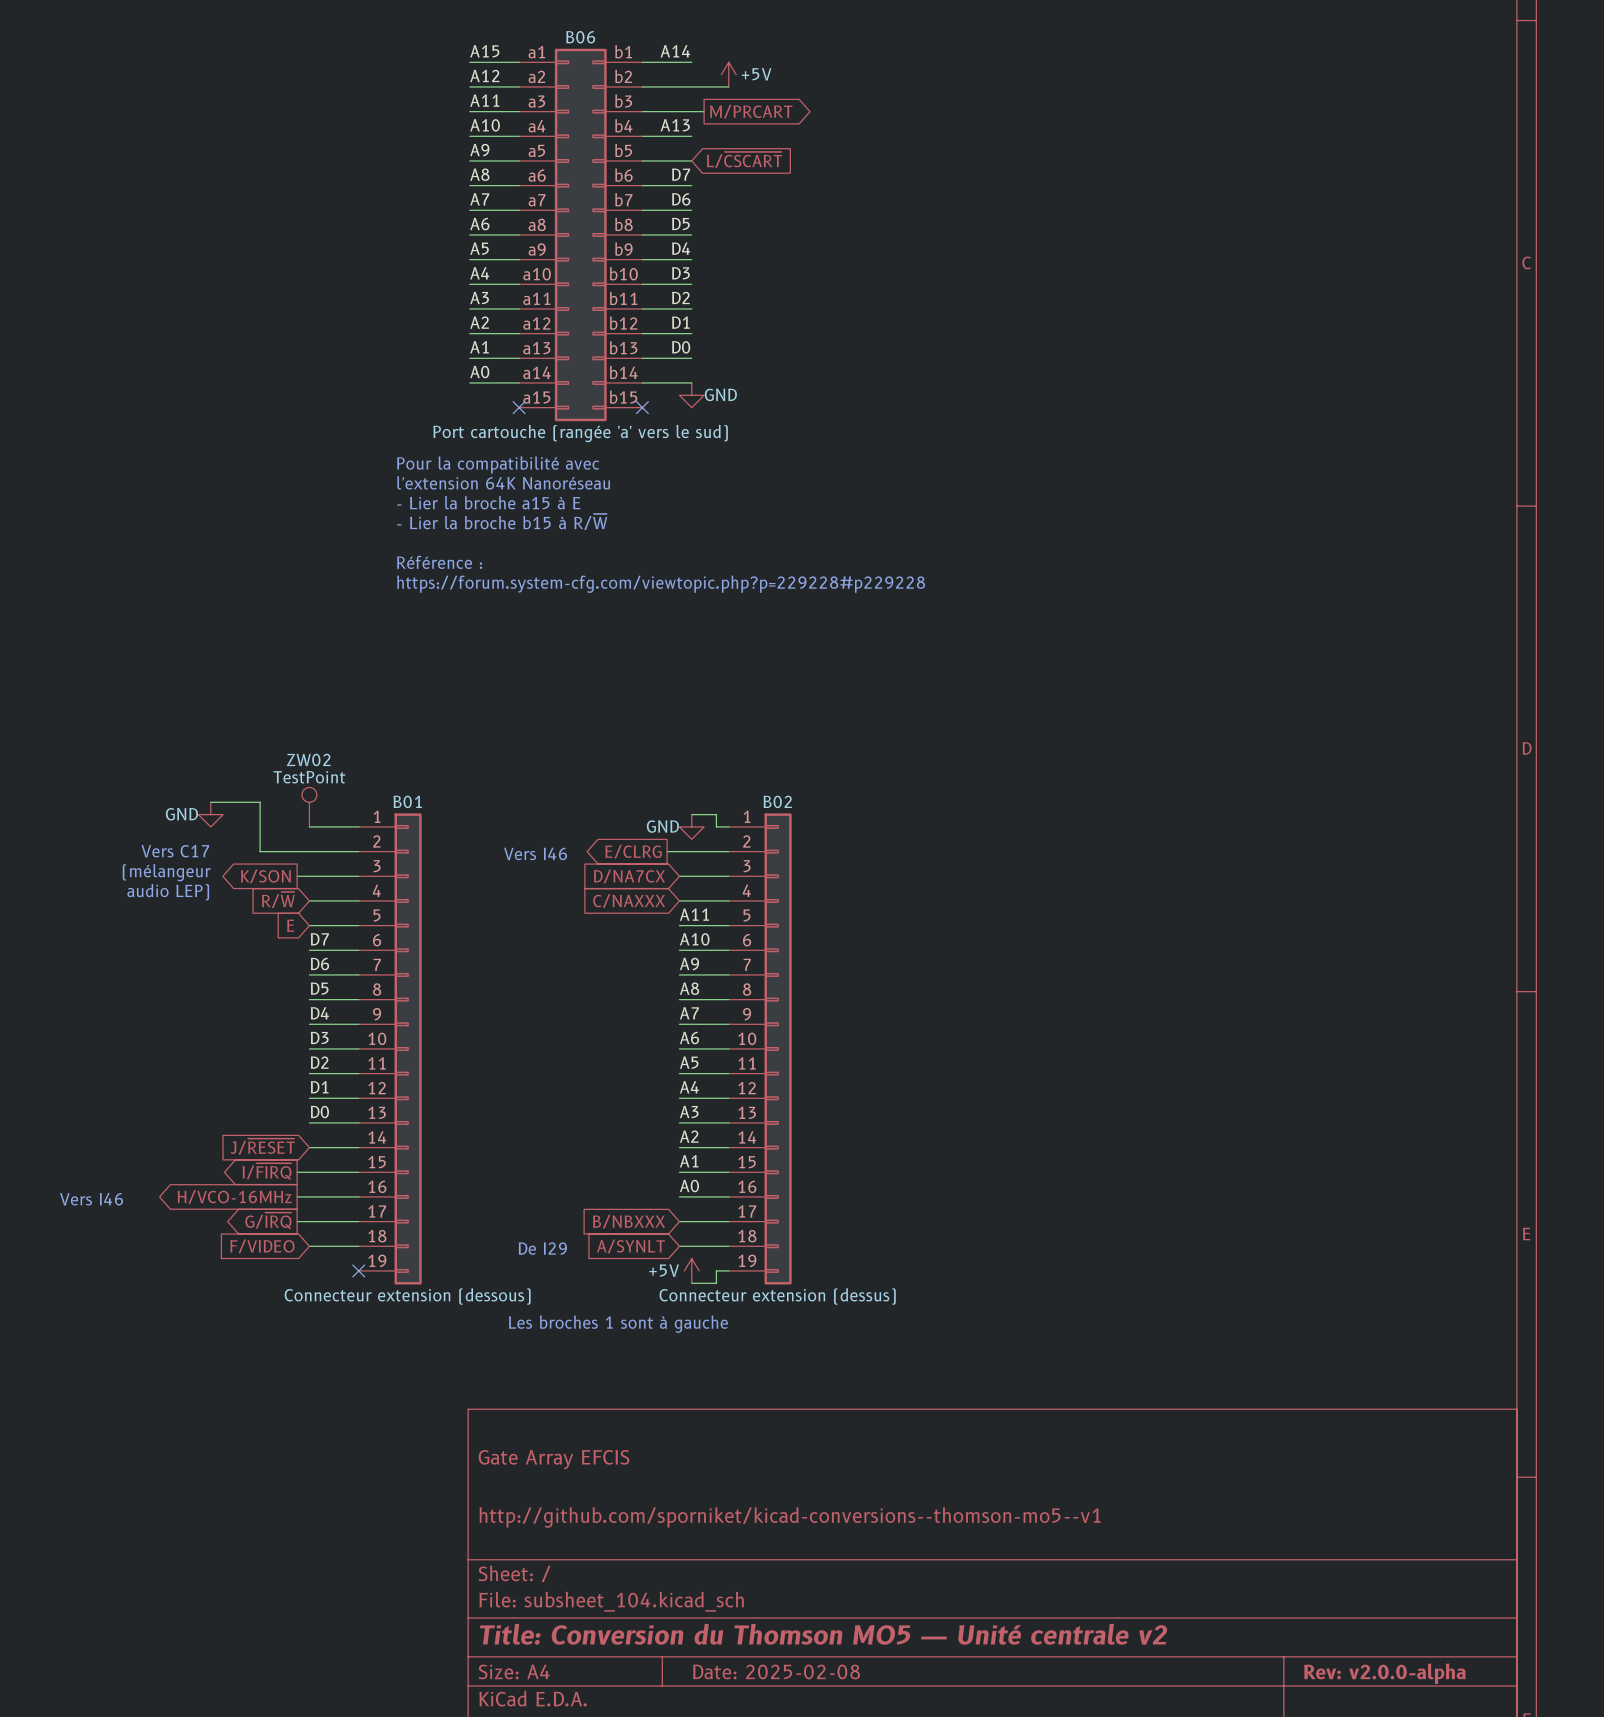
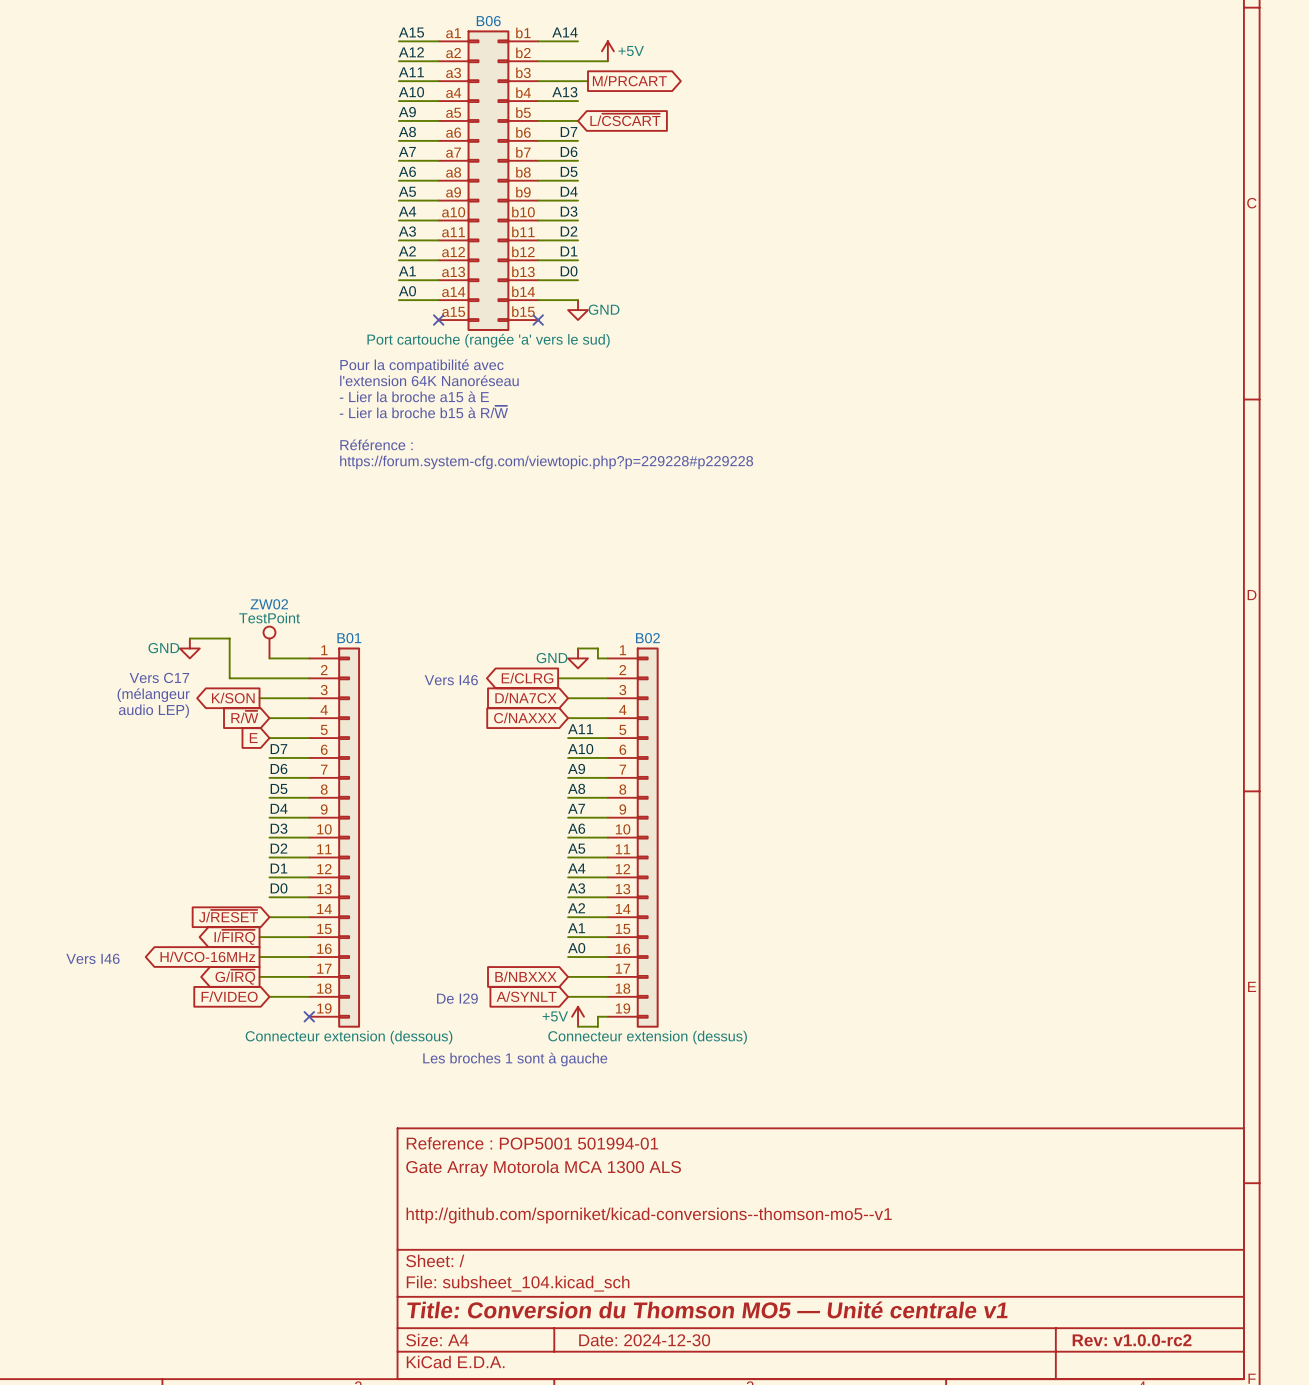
title block: none -> Reference : POP5001 501994-01 (532, 1143)
title block: Gate Array EFCIS (553, 1459) -> Gate Array Motorola MCA 1300 ALS (543, 1168)
title block: Title: Conversion du Thomson MO5 — Unité centrale v2 (823, 1634) -> Title: Conversion du Thomson MO5 — Unité centrale v1 (707, 1309)
title block: Date: 2025-02-08 (776, 1671) -> Date: 2024-12-30 (644, 1340)
title block: Rev: v2.0.0-alpha (1384, 1673) -> Rev: v1.0.0-rc2 (1132, 1340)

